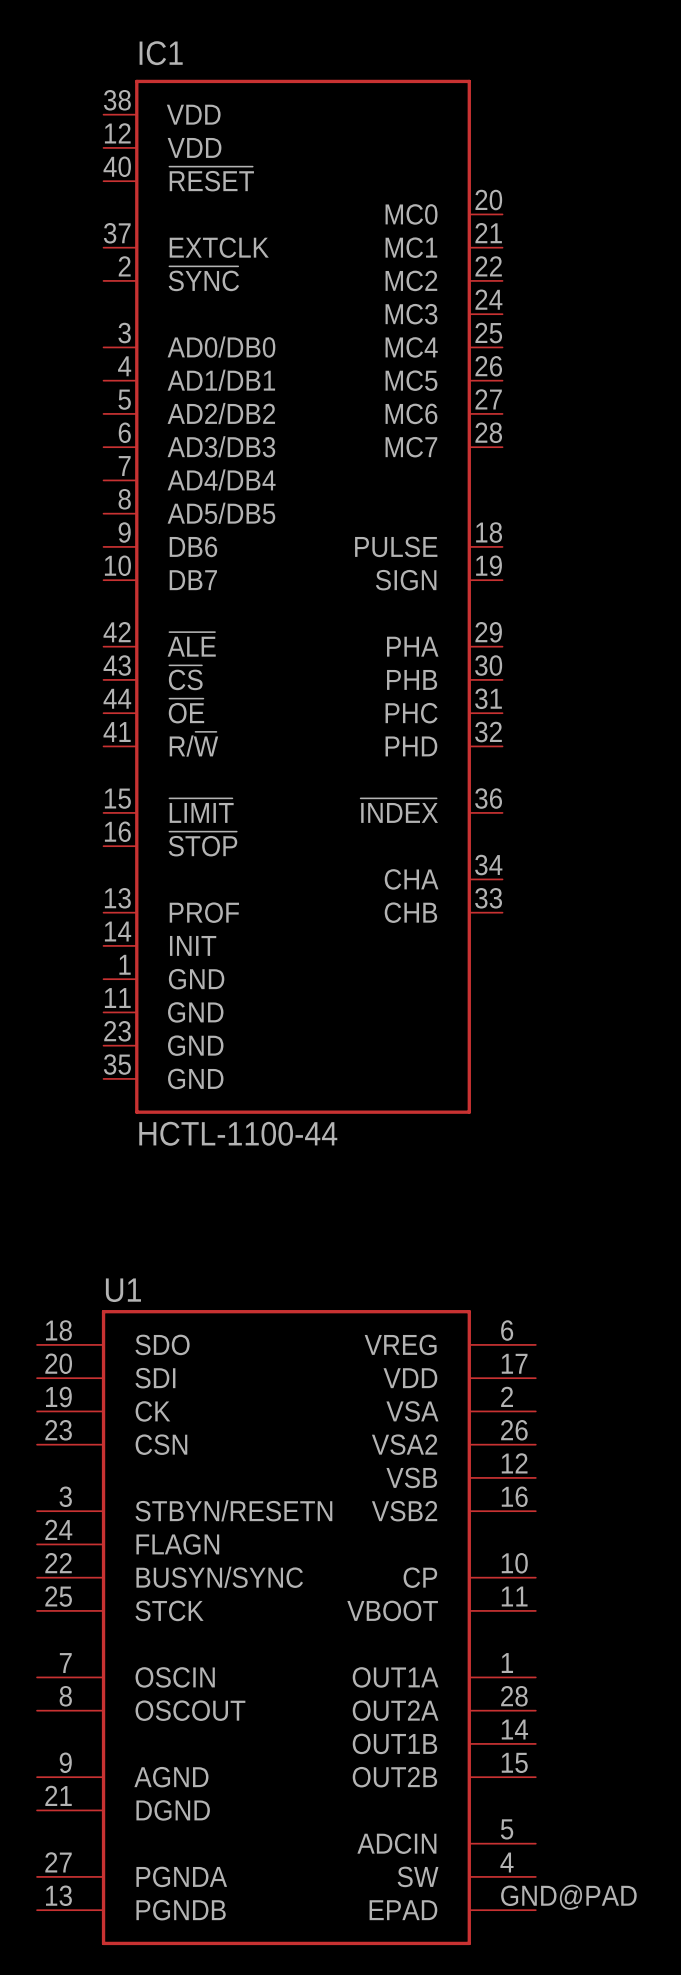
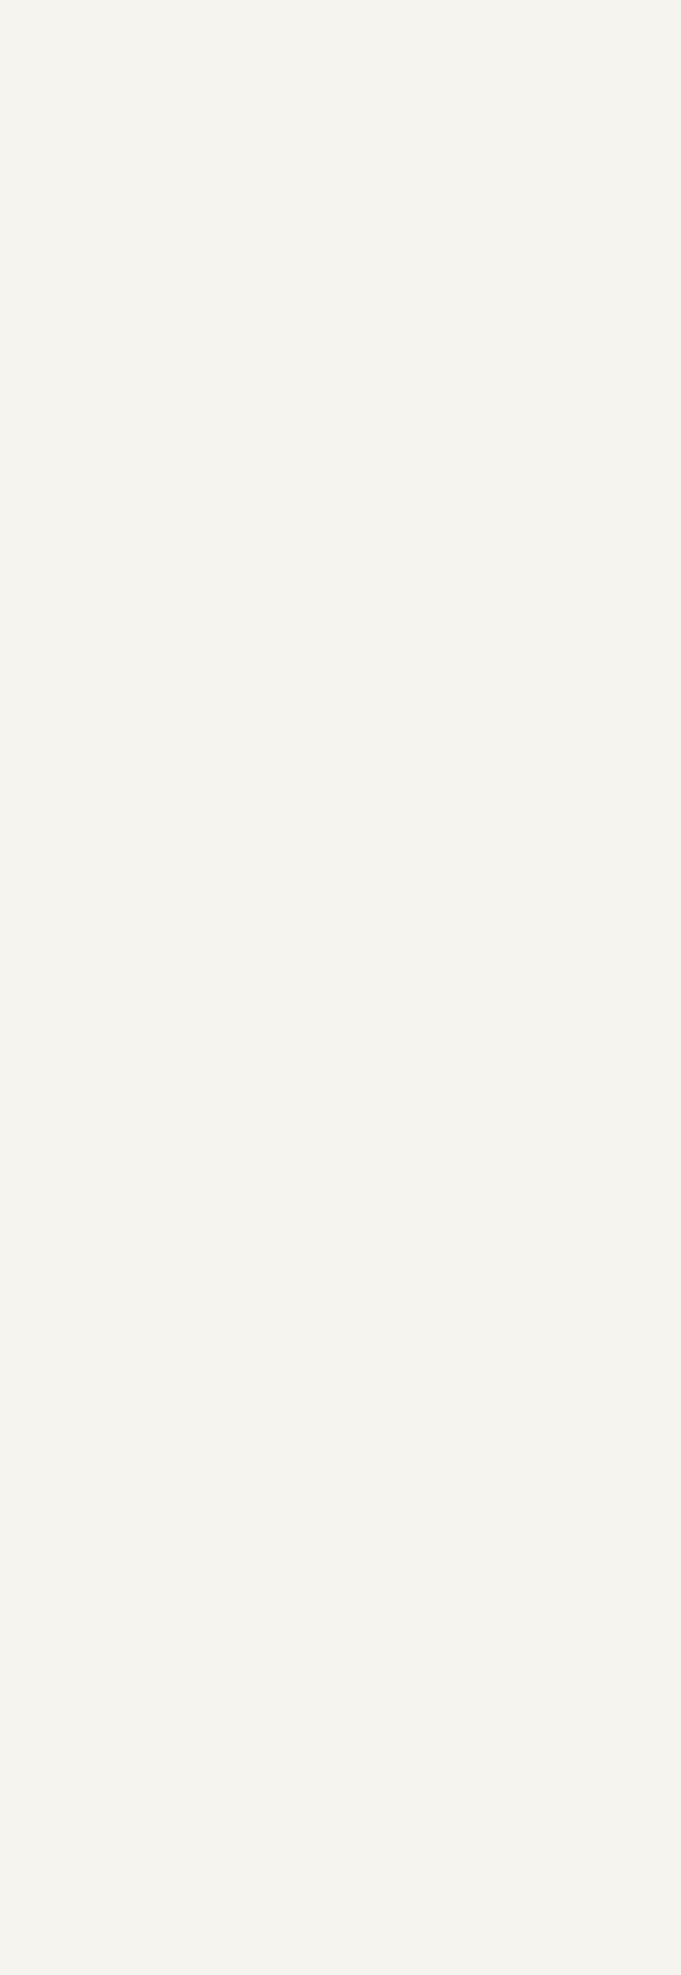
IC1: HCTL-1100-44 (303, 596) -> none
U1: (286, 1627) -> none

